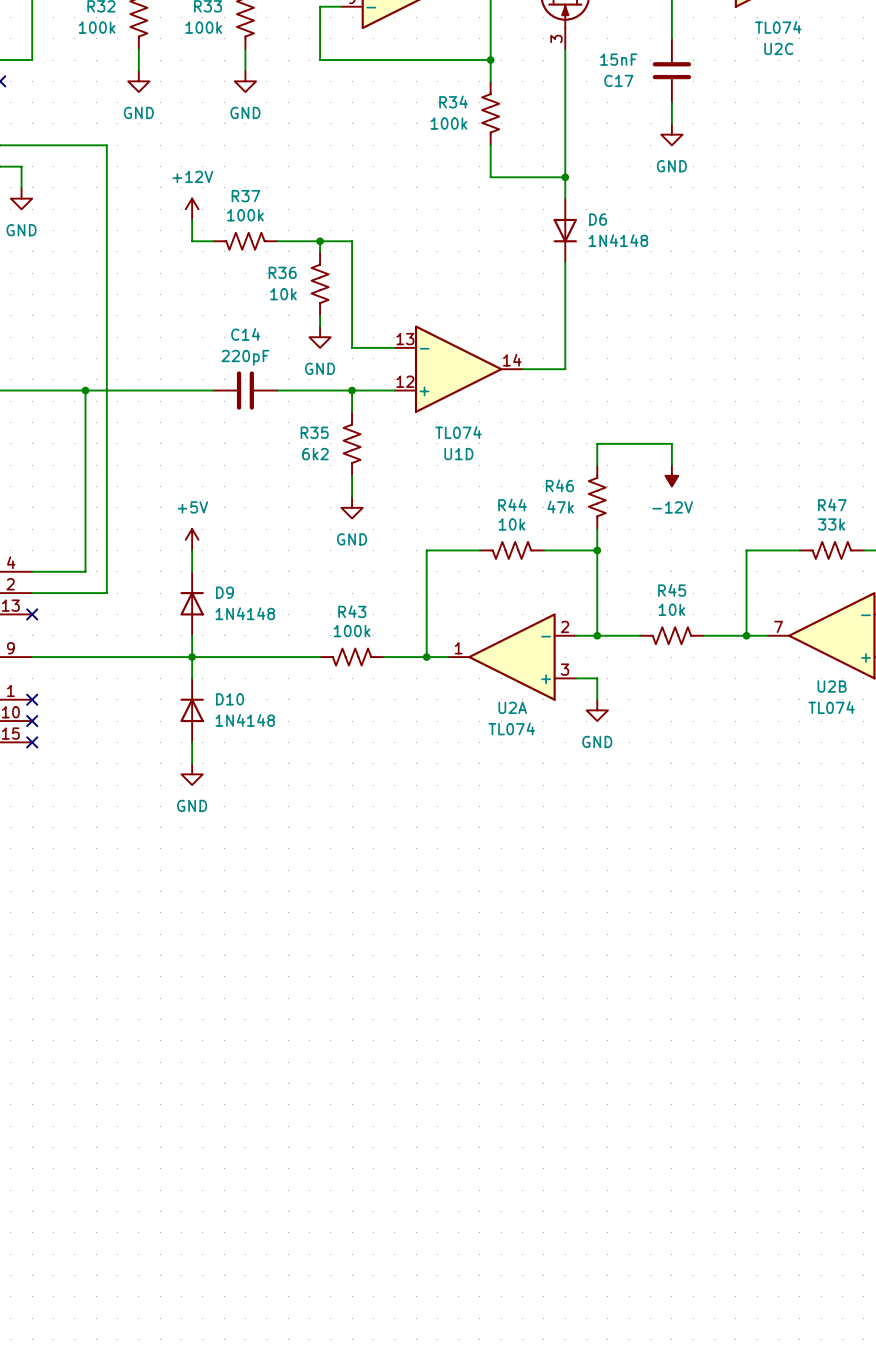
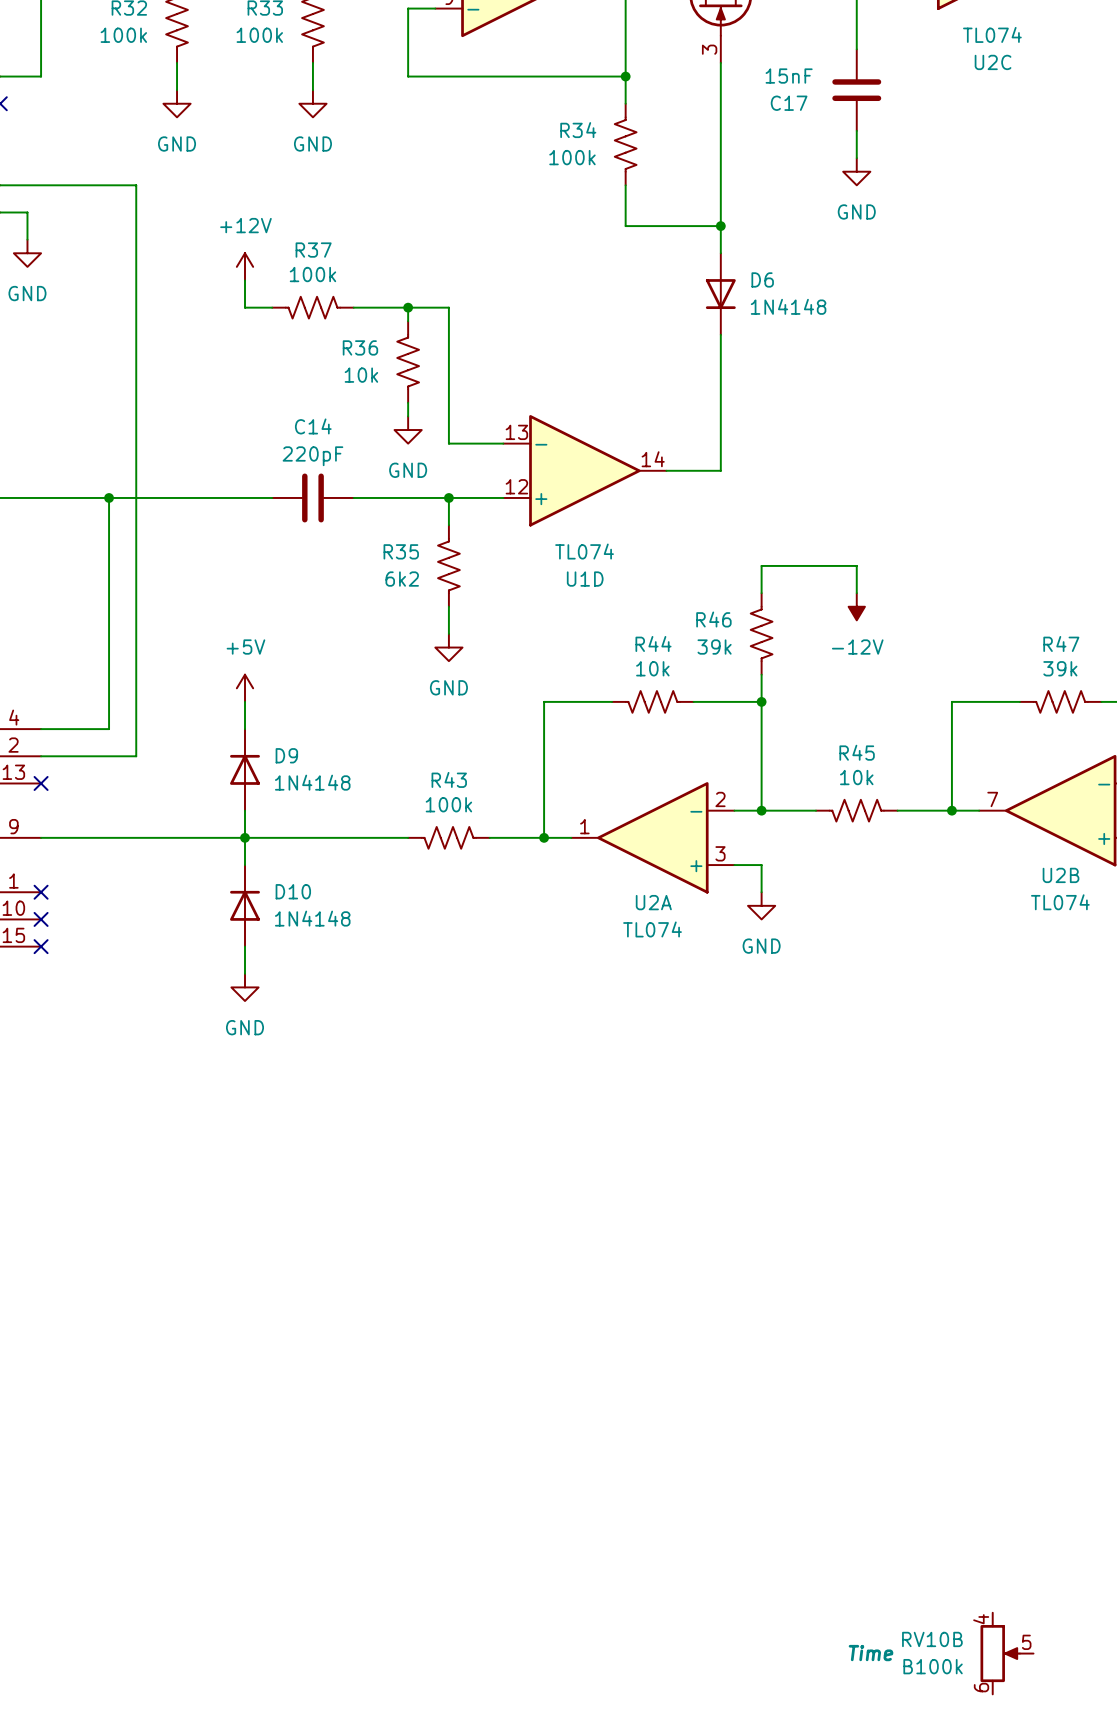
R46 value: 47k (560, 507) -> 39k (714, 647)
R47 value: 33k (831, 524) -> 39k (1060, 668)
RV10B: none -> B100k (1006, 1653)

